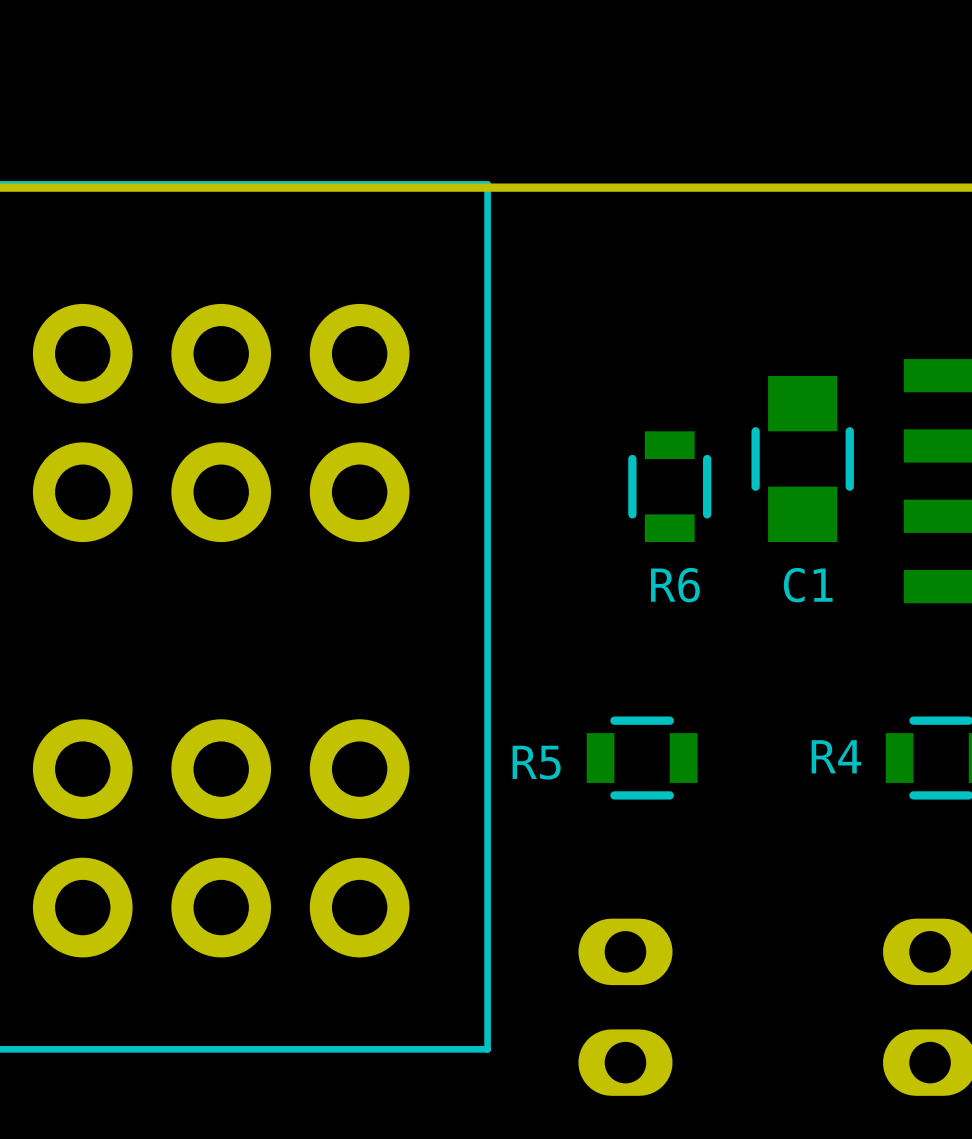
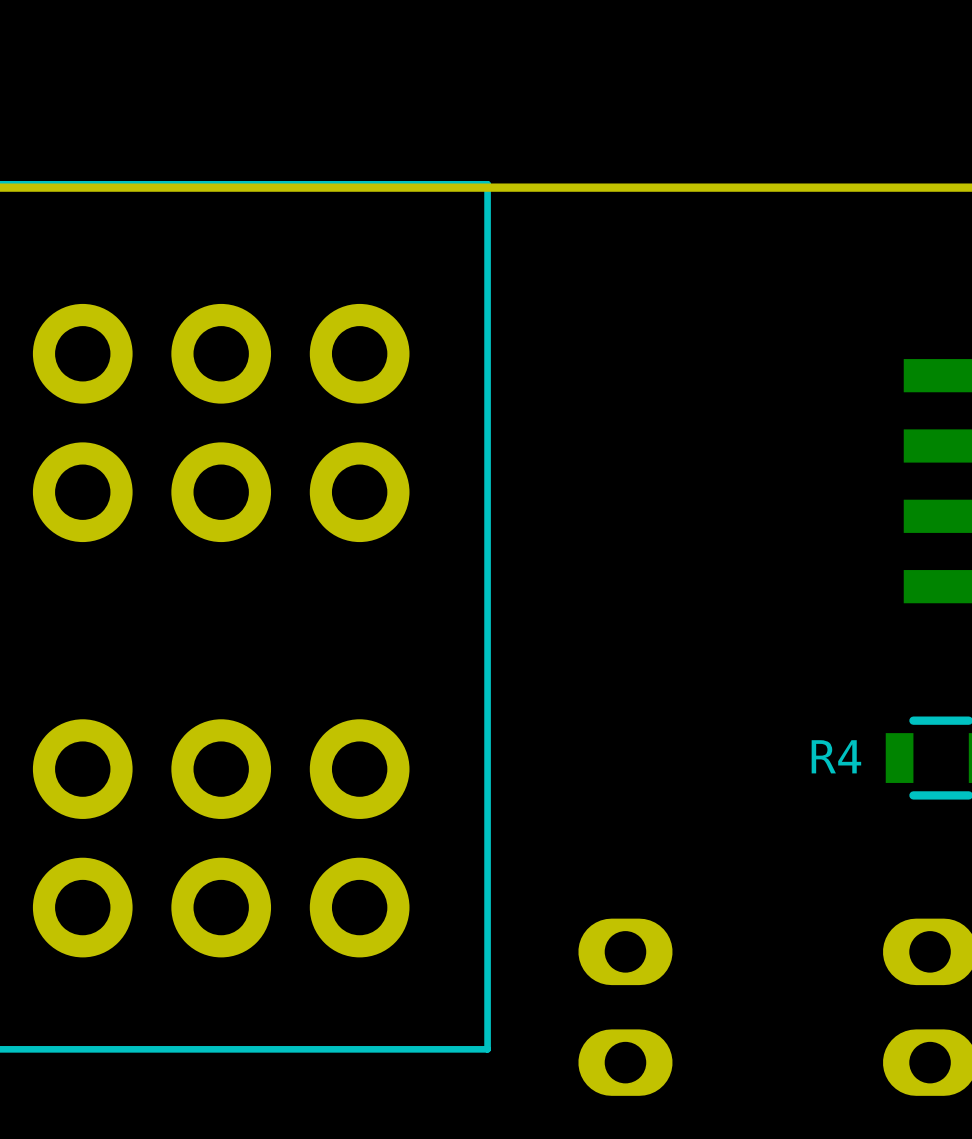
C1: (802, 458) -> none
R6: (669, 486) -> none
R5: (642, 758) -> none

